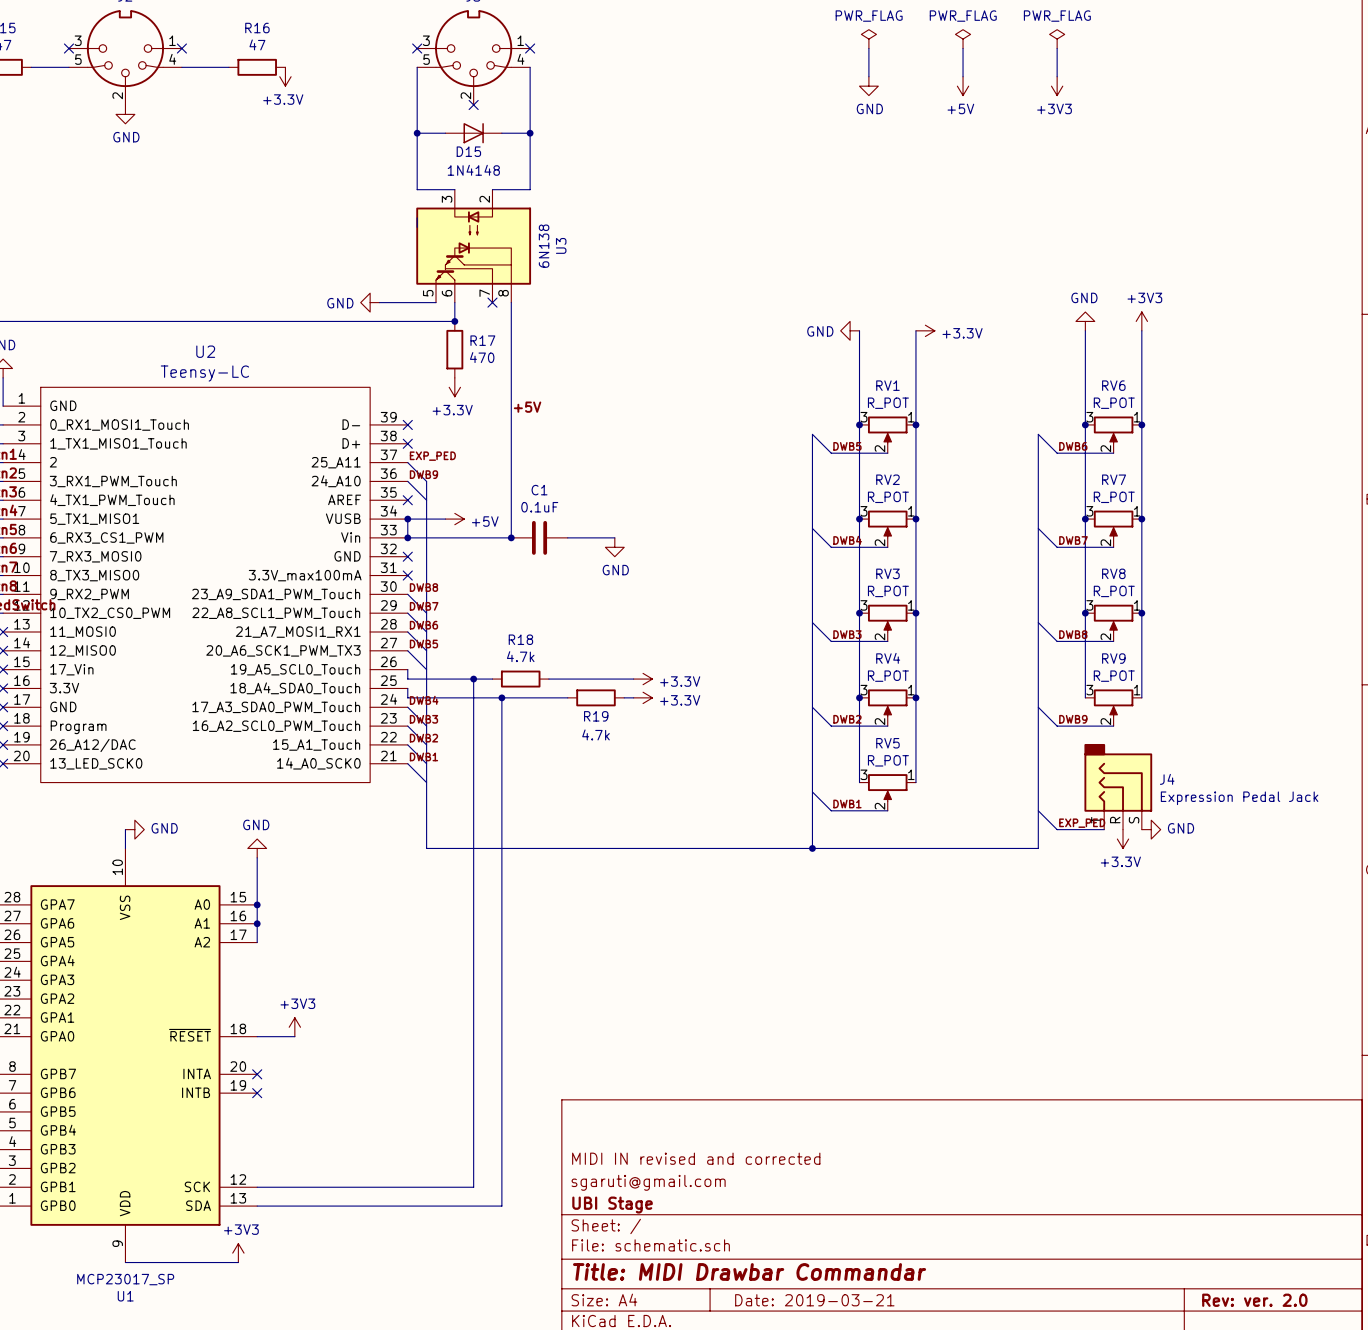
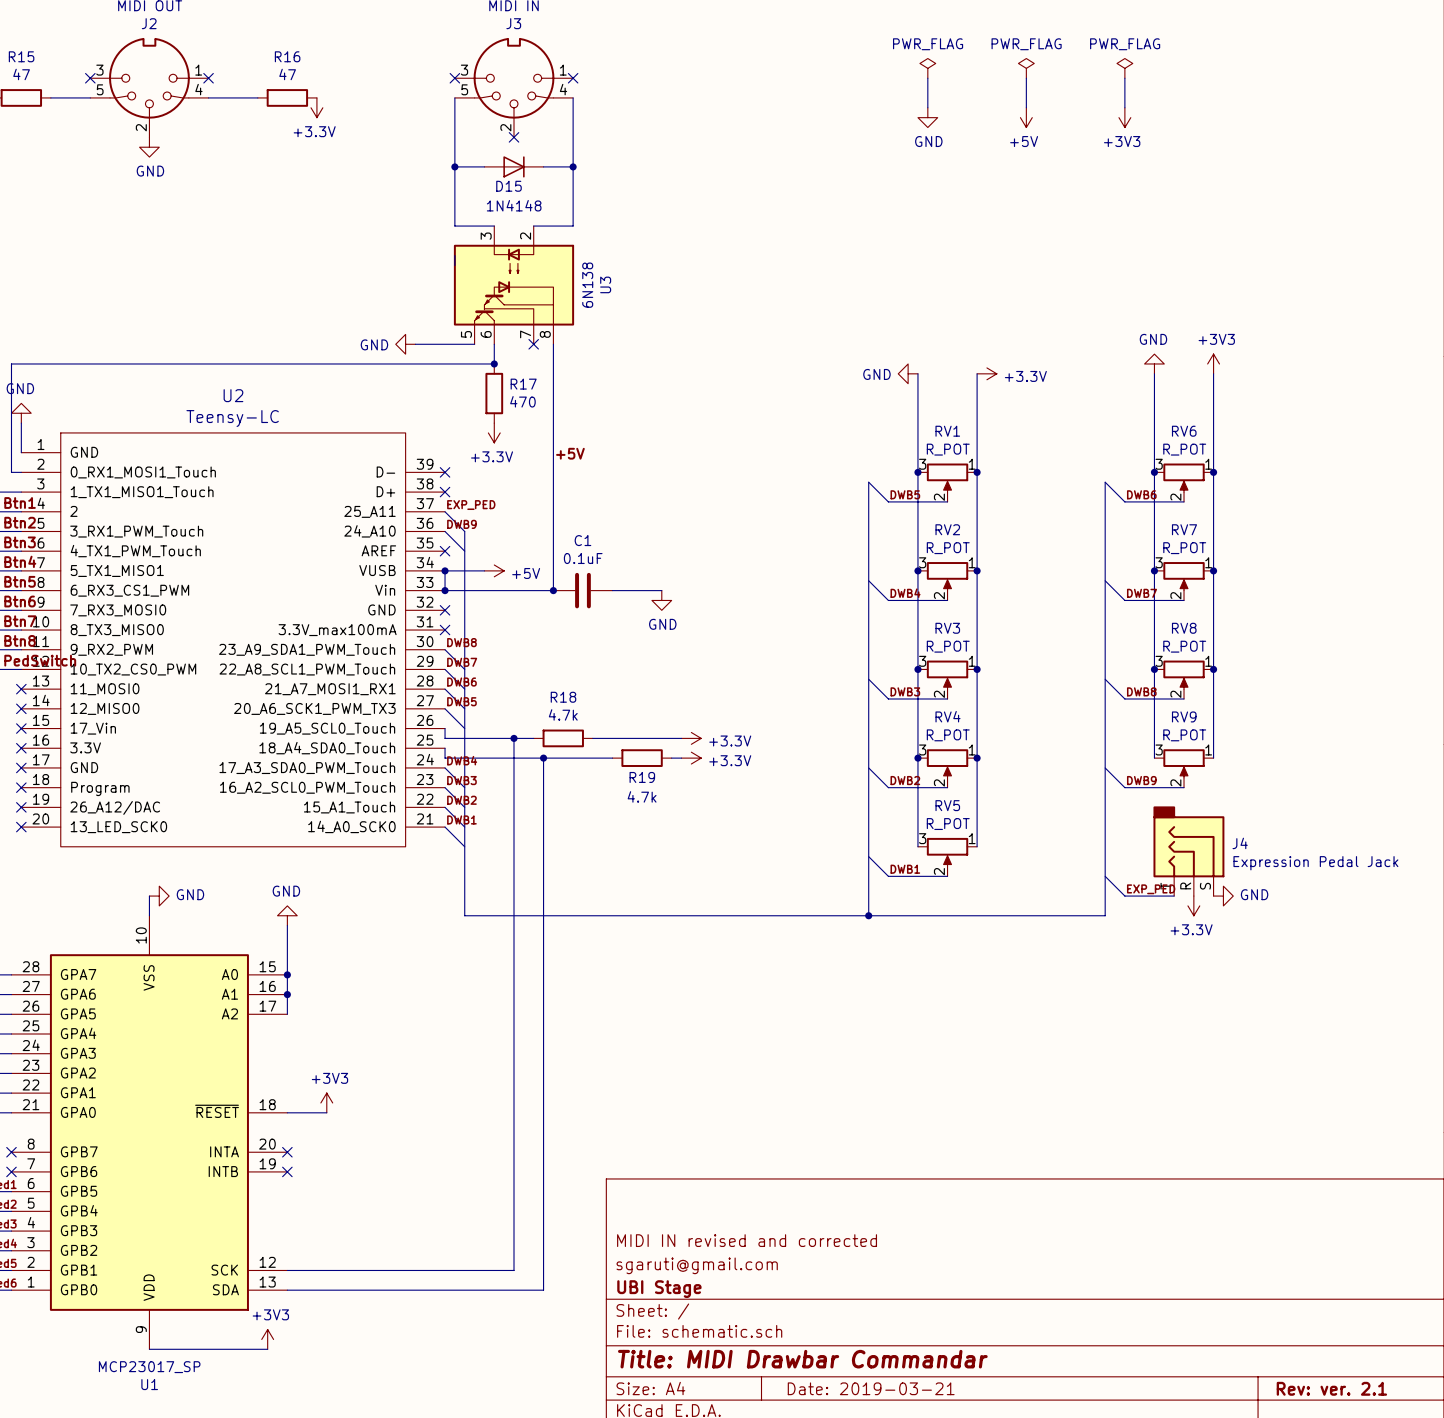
title block: Rev: ver. 2.0 (1254, 1300) -> Rev: ver. 2.1 (1331, 1388)

